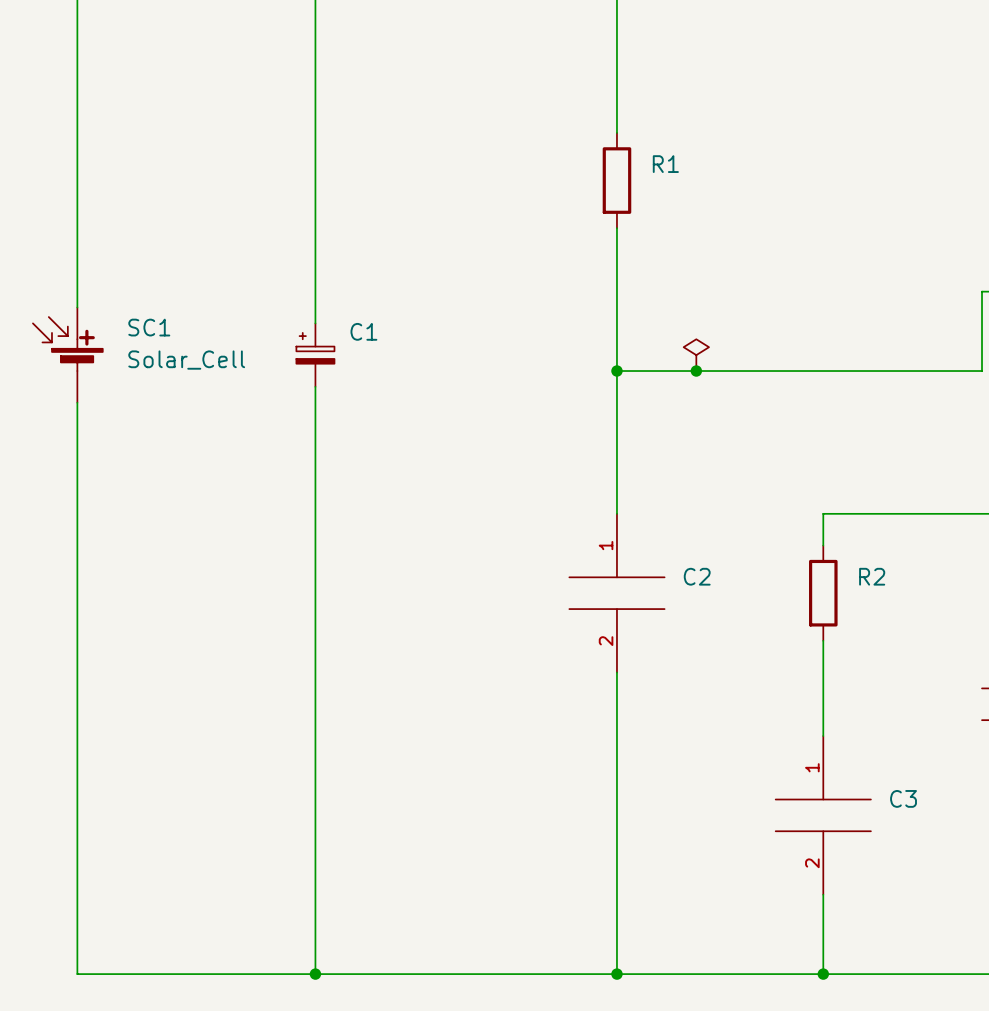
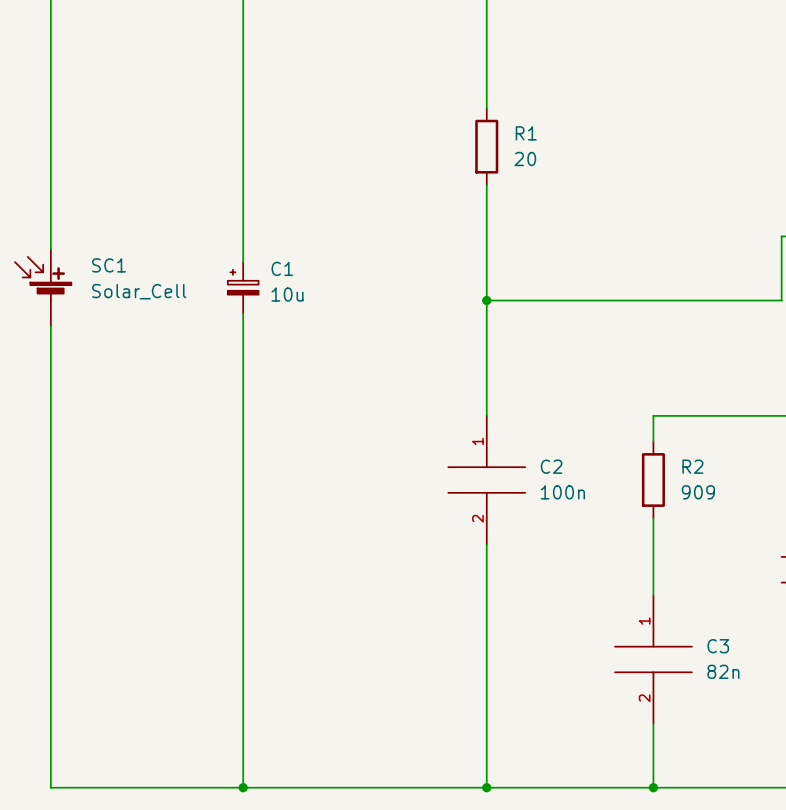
R1 value: none -> 20 (525, 159)
power symbol: (696, 355) -> none
C1 value: none -> 10u (287, 294)
junction: (696, 371) -> none
C2 value: none -> 100n (562, 492)
R2 value: none -> 909 (698, 492)
C3 value: none -> 82n (723, 671)

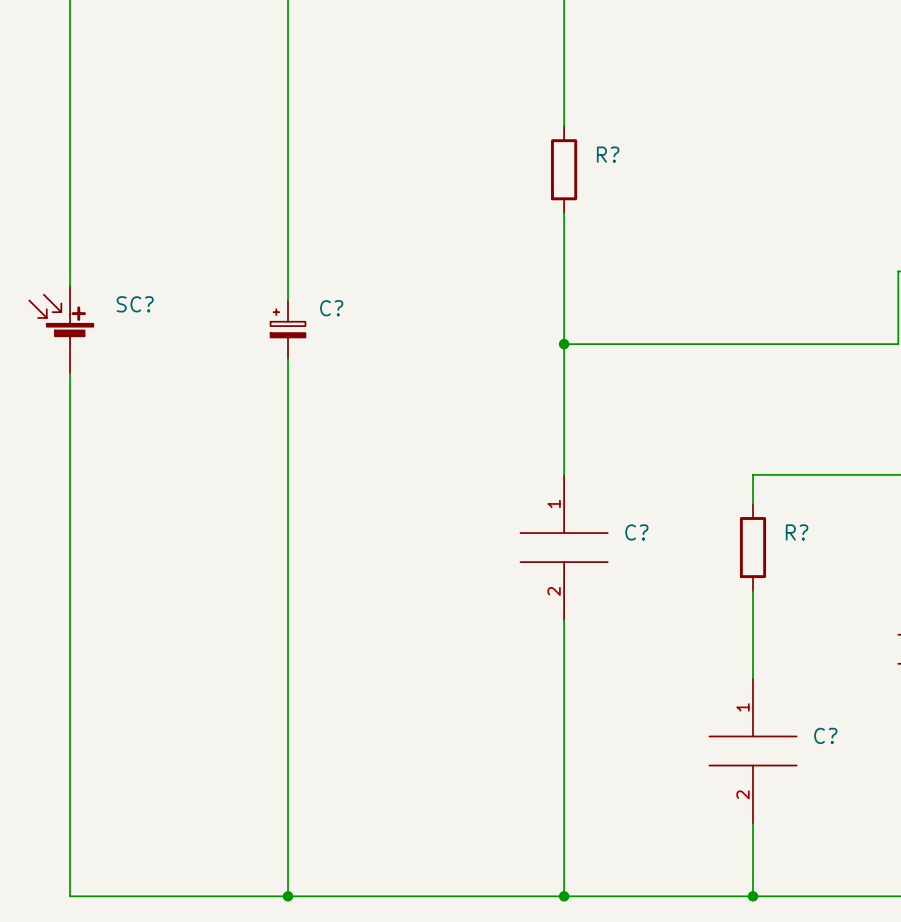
R1 name: R1 (526, 133) -> R? (608, 154)
R1 value: 20 (525, 159) -> none
SC1 name: SC1 (108, 265) -> SC? (135, 304)
C1 name: C1 (282, 268) -> C? (331, 308)
SC1 value: Solar_Cell (139, 291) -> none
C1 value: 10u (287, 294) -> none
C2 name: C2 (551, 466) -> C? (636, 532)
R2 name: R2 (692, 466) -> R? (797, 532)
C2 value: 100n (562, 492) -> none
R2 value: 909 (698, 492) -> none
C3 name: C3 (718, 646) -> C? (825, 735)
C3 value: 82n (723, 671) -> none

